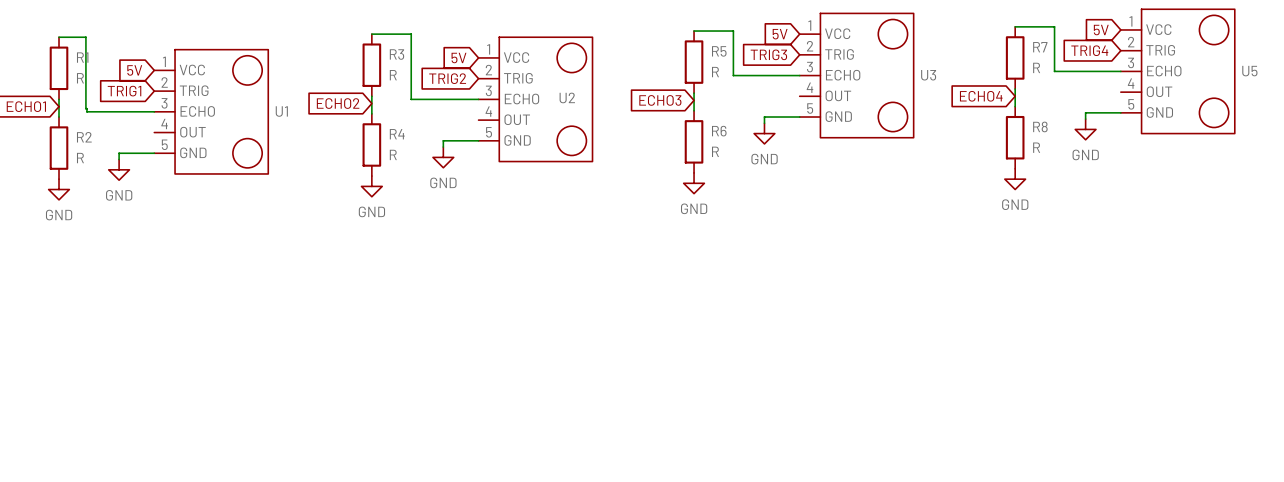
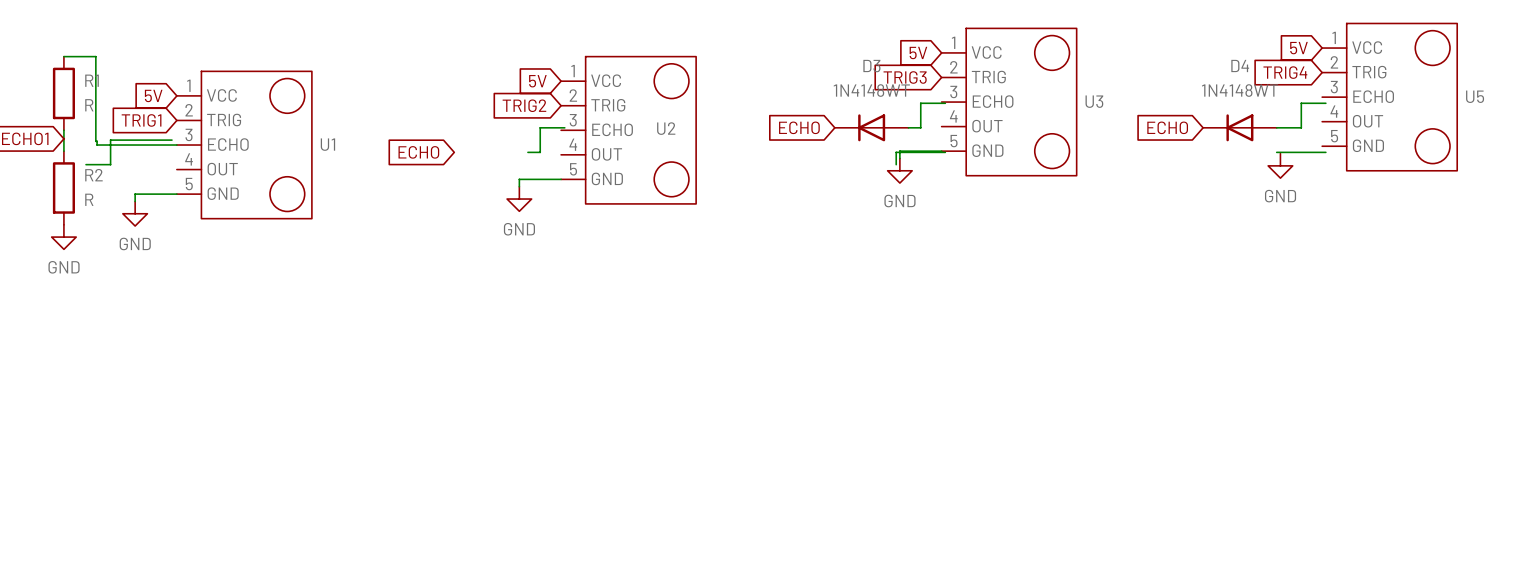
wire: (1015, 26) (1054, 26) (1054, 71) (1120, 71) -> none
wire: (694, 31) (733, 31) (733, 75) (799, 75) -> none
wire: (371, 34) (411, 34) (411, 99) (478, 99) -> none
R7: R (1015, 57) -> none
R5: R (694, 62) -> none
R3: R (371, 65) -> none
wire: none -> (945, 103) (920, 103) (920, 127) (908, 127)
wire: none -> (1325, 103) (1301, 103) (1301, 127) (1276, 127)
wire: (1015, 89) (1015, 106) -> none
wire: (694, 93) (694, 110) -> none
wire: (371, 96) (371, 113) -> none
global label: ECHO4 (981, 96) -> ECHO (1167, 127)
wire: none -> (564, 127) (540, 127) (540, 152) (527, 152)
D3: none -> 1N4148WT (871, 127)
D4: none -> 1N4148WT (1239, 127)
global label: ECHO3 (660, 100) -> ECHO (799, 127)
global label: ECHO2 (338, 103) -> ECHO (418, 152)
wire: none -> (171, 140) (110, 140) (110, 164) (86, 164)
wire: (1120, 112) (1085, 112) (1085, 119) -> none
wire: none -> (945, 152) (896, 152) (896, 164)
wire: none -> (1276, 152) (1325, 152)
R8: R (1015, 137) -> none
R6: R (694, 141) -> none
R4: R (371, 144) -> none
power symbol: GND (1015, 179) -> none
power symbol: GND (694, 183) -> none
power symbol: GND (371, 186) -> none

